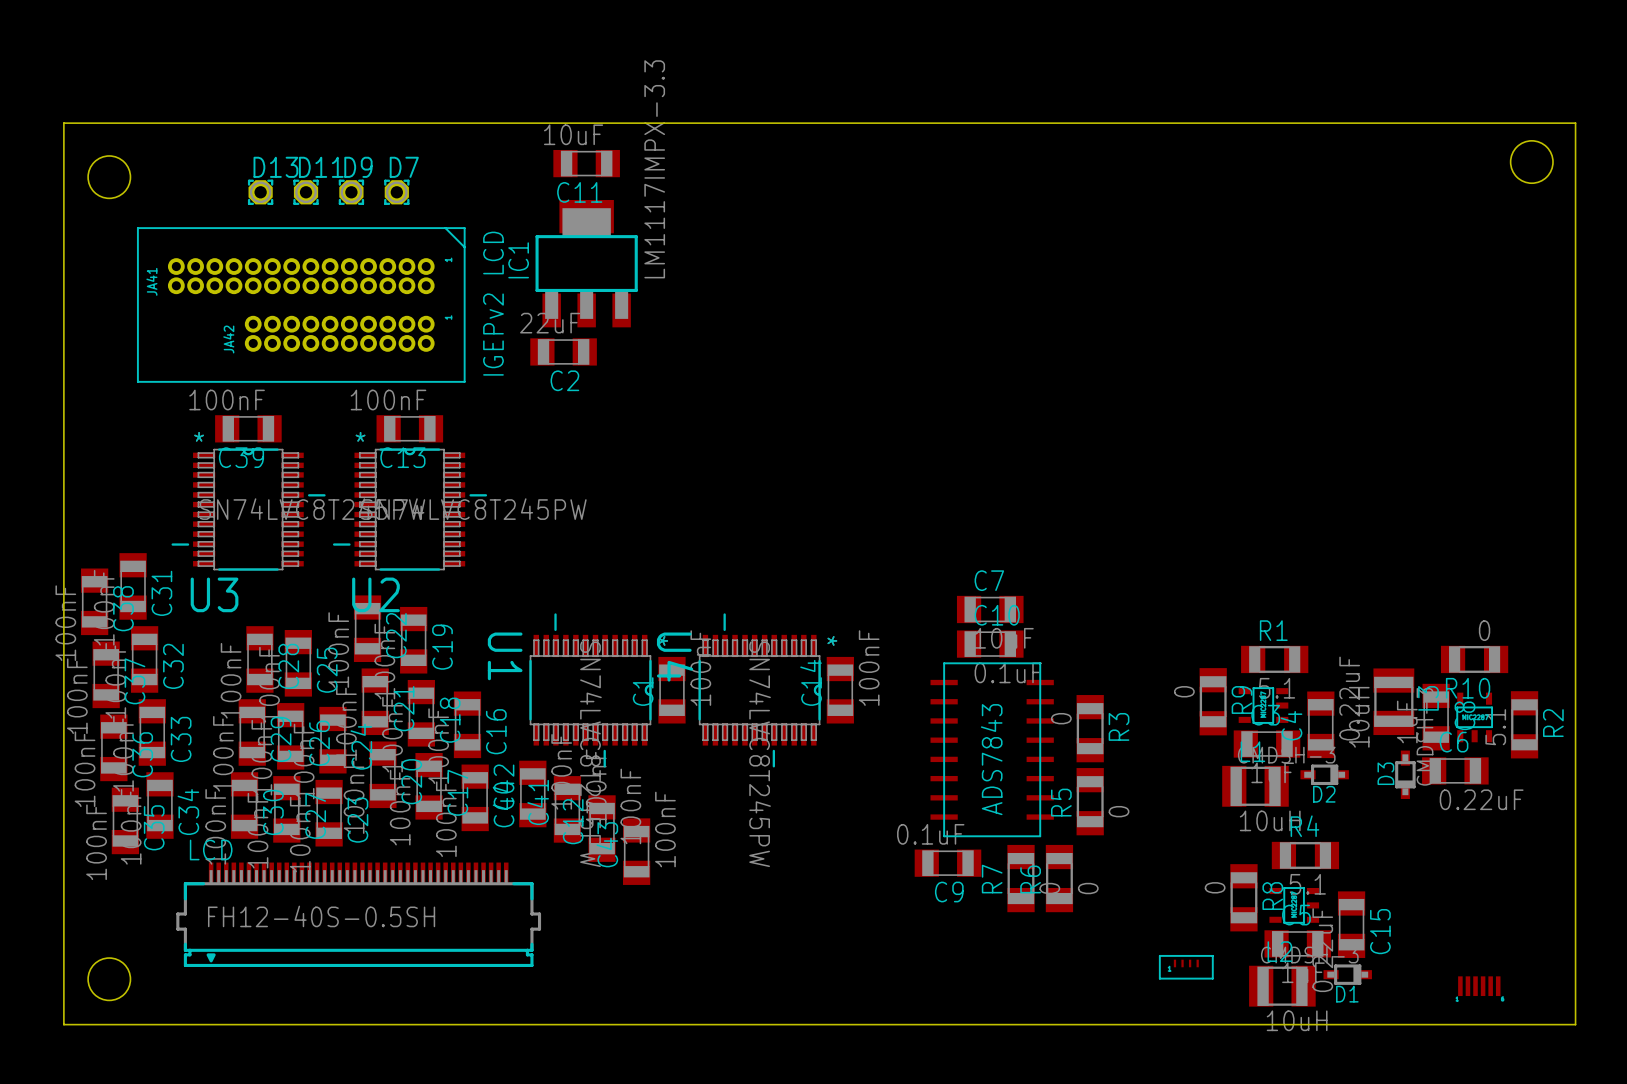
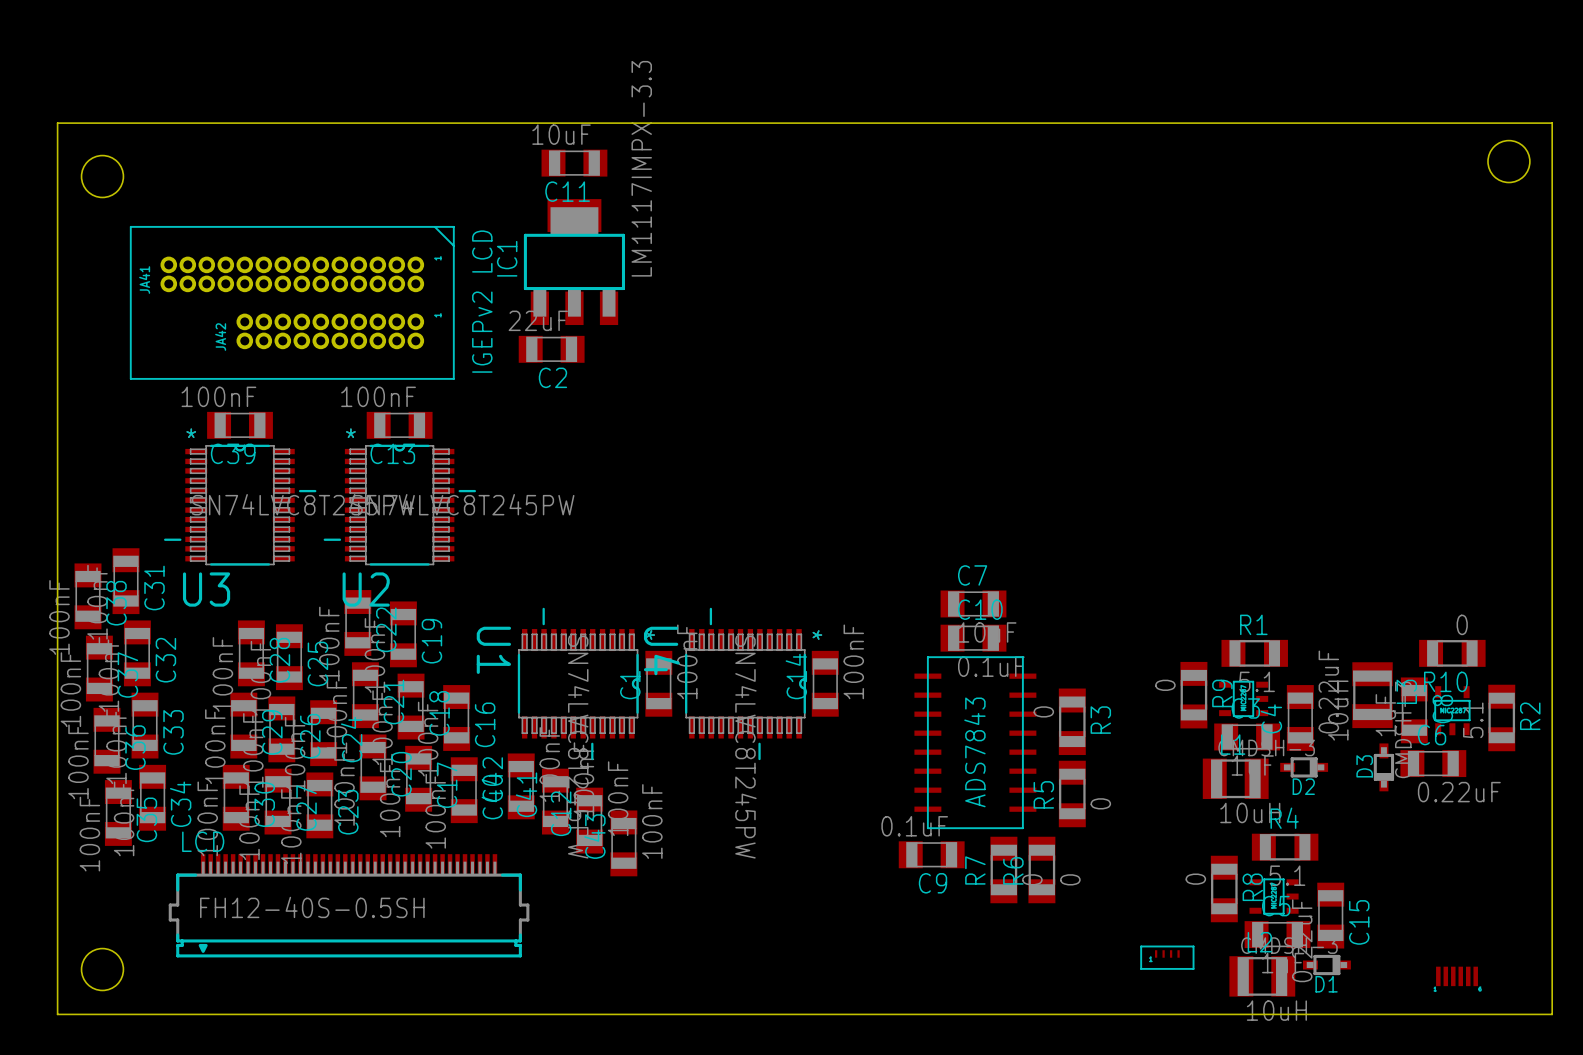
D13: (260, 192) -> none
D11: (306, 192) -> none
D9: (351, 192) -> none
D7: (396, 192) -> none

